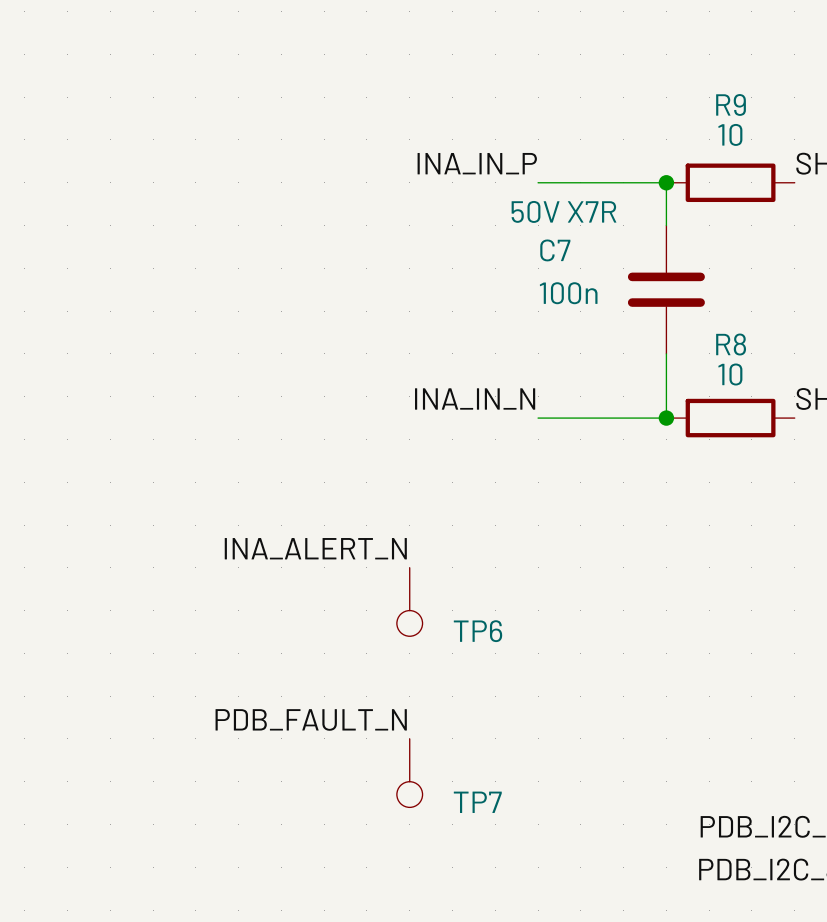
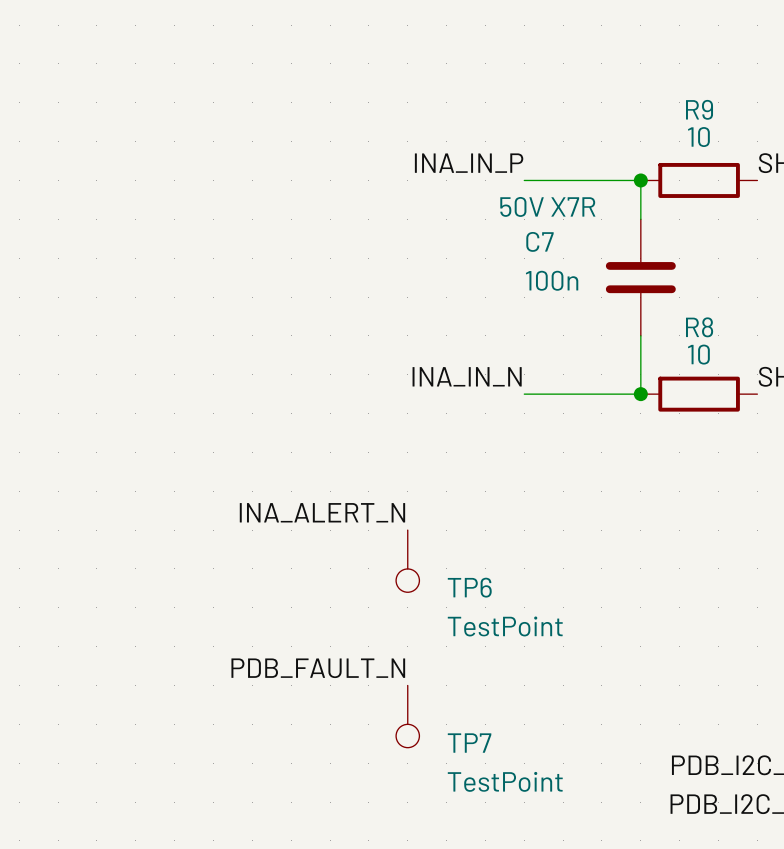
TP6 value: none -> TestPoint (505, 626)
TP7 value: none -> TestPoint (505, 781)

